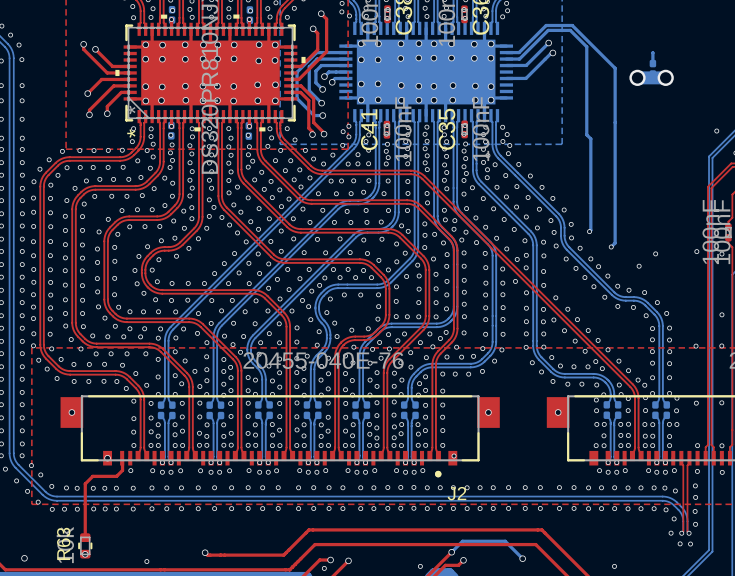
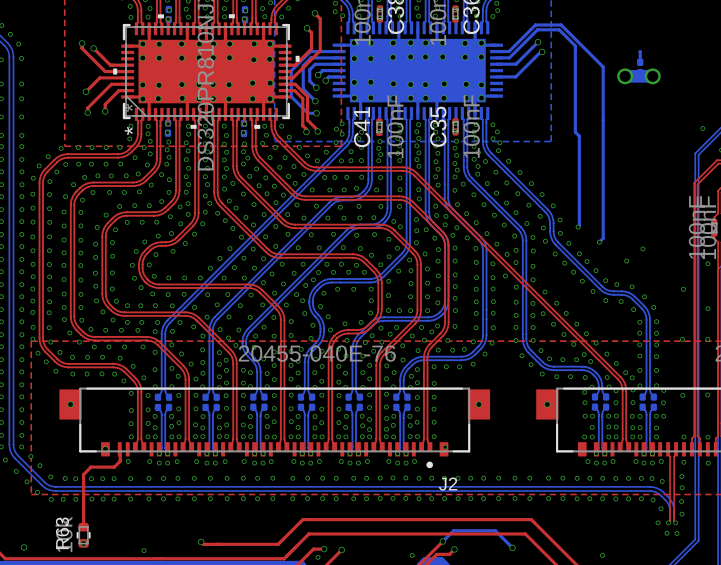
via: (696, 251) -> none
via: (721, 254) -> none
via: none -> (707, 263)
via: none -> (683, 289)

